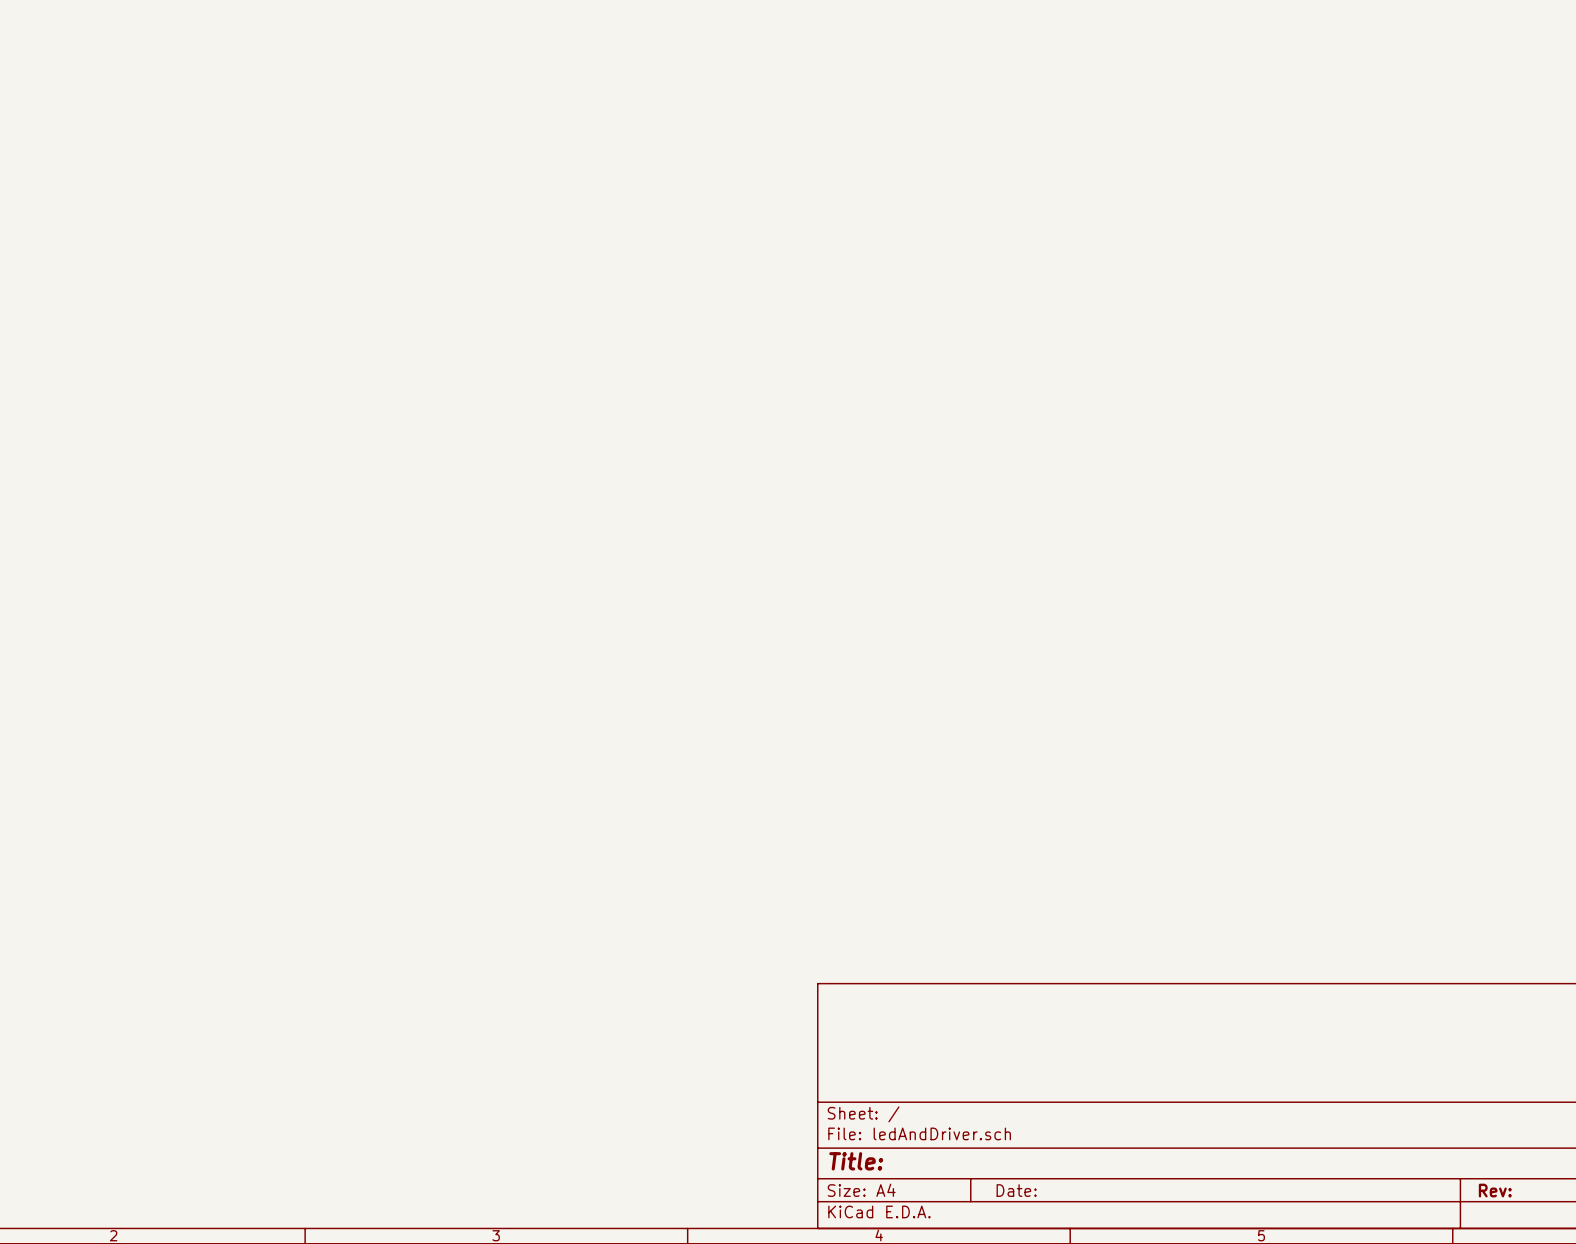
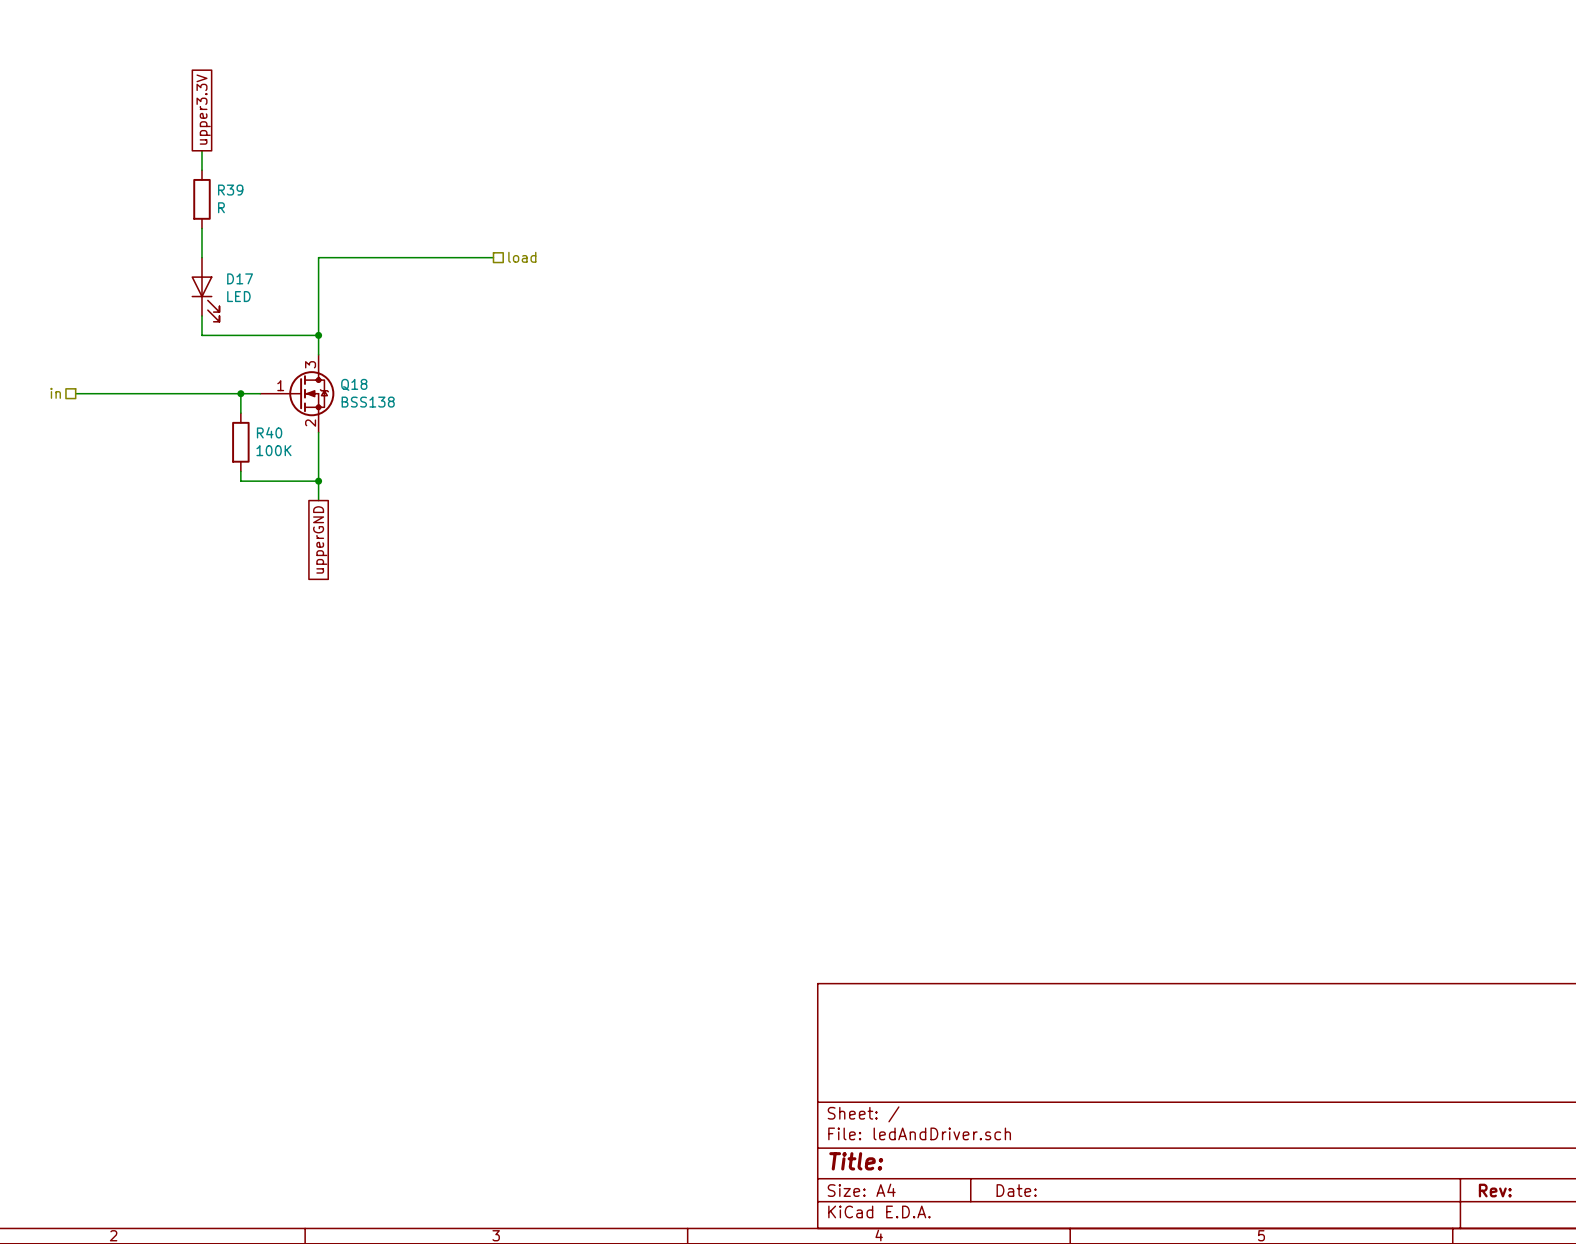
global label: none -> upper3.3V (203, 109)
wire: none -> (201, 150) (201, 170)
R39: none -> R (201, 199)
wire: none -> (201, 228) (201, 257)
wire: none -> (493, 257) (318, 257) (318, 354)
hierarchical label: none -> load (522, 257)
D17: none -> LED (205, 289)
wire: none -> (201, 315) (201, 335) (318, 335)
junction: none -> (318, 335)
hierarchical label: none -> in (55, 393)
wire: none -> (75, 393) (260, 393)
wire: none -> (240, 393) (240, 413)
junction: none -> (240, 393)
Q18: none -> BSS138 (297, 393)
wire: none -> (318, 432) (318, 500)
R40: none -> 100K (240, 442)
wire: none -> (240, 471) (240, 481) (318, 481)
junction: none -> (318, 481)
global label: none -> upperGND (320, 539)

